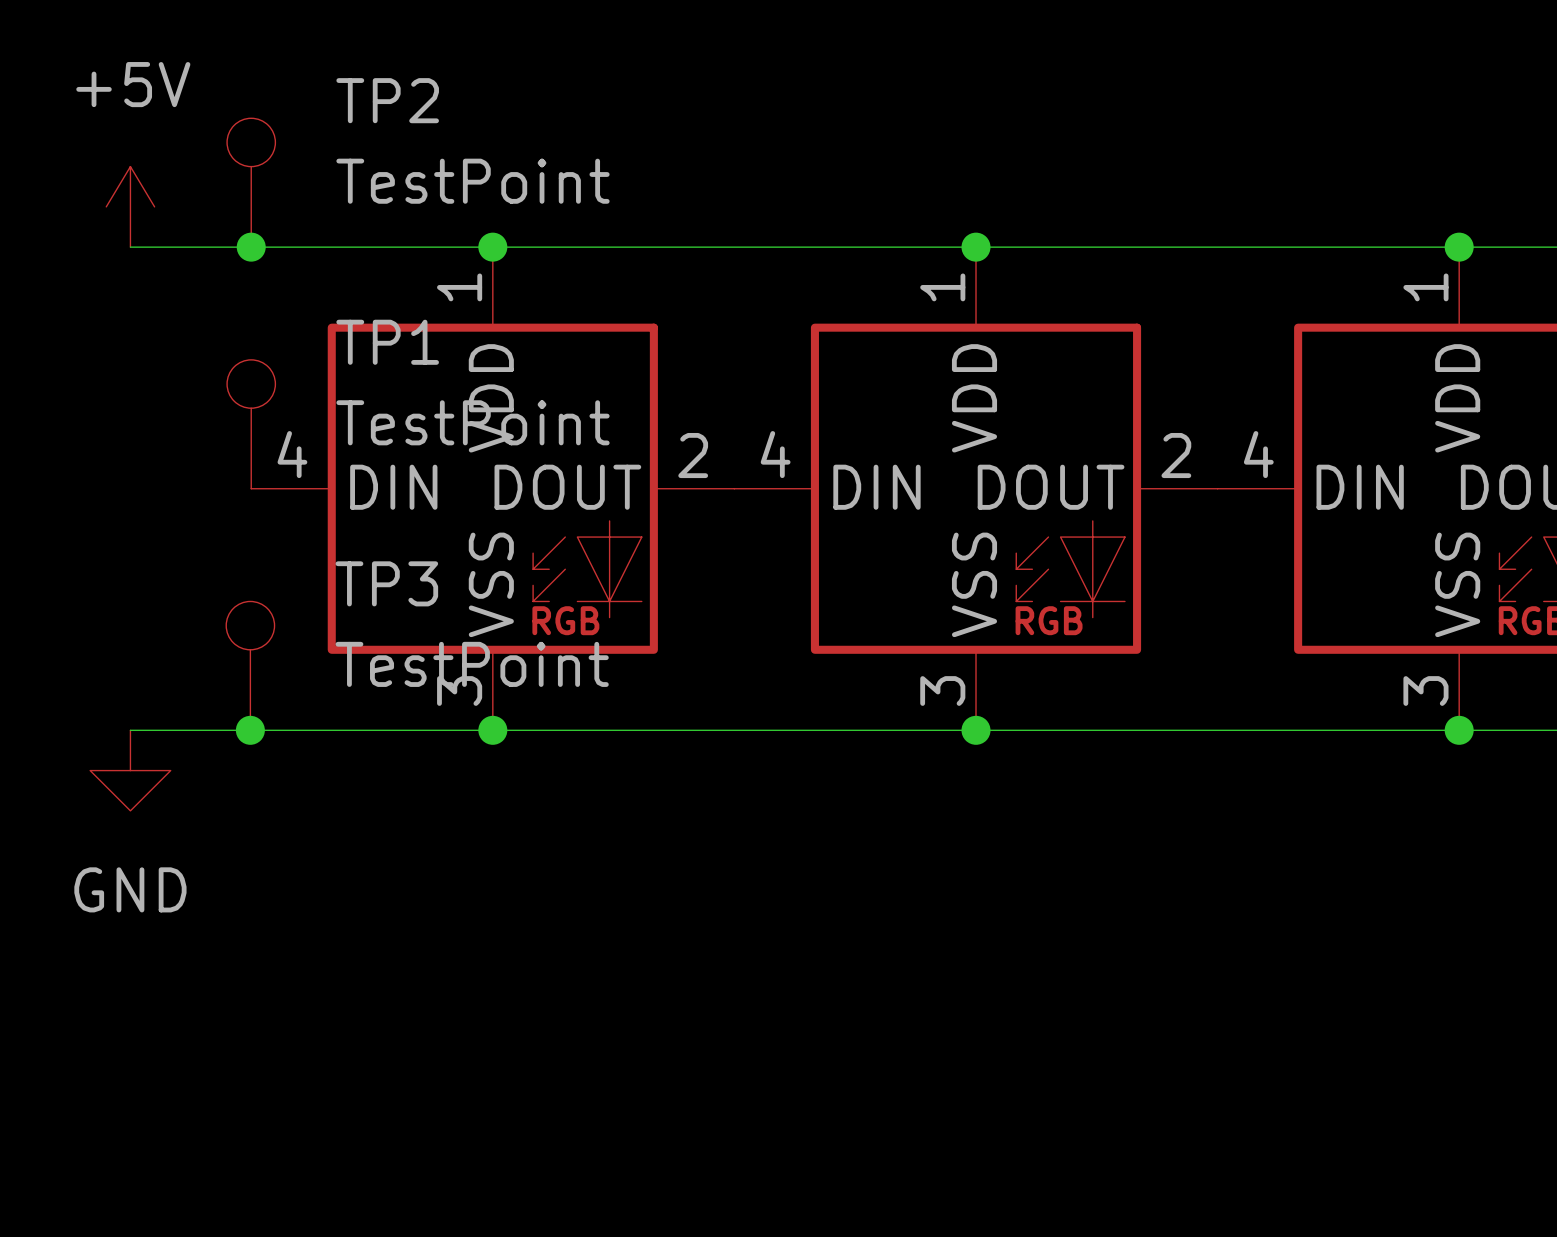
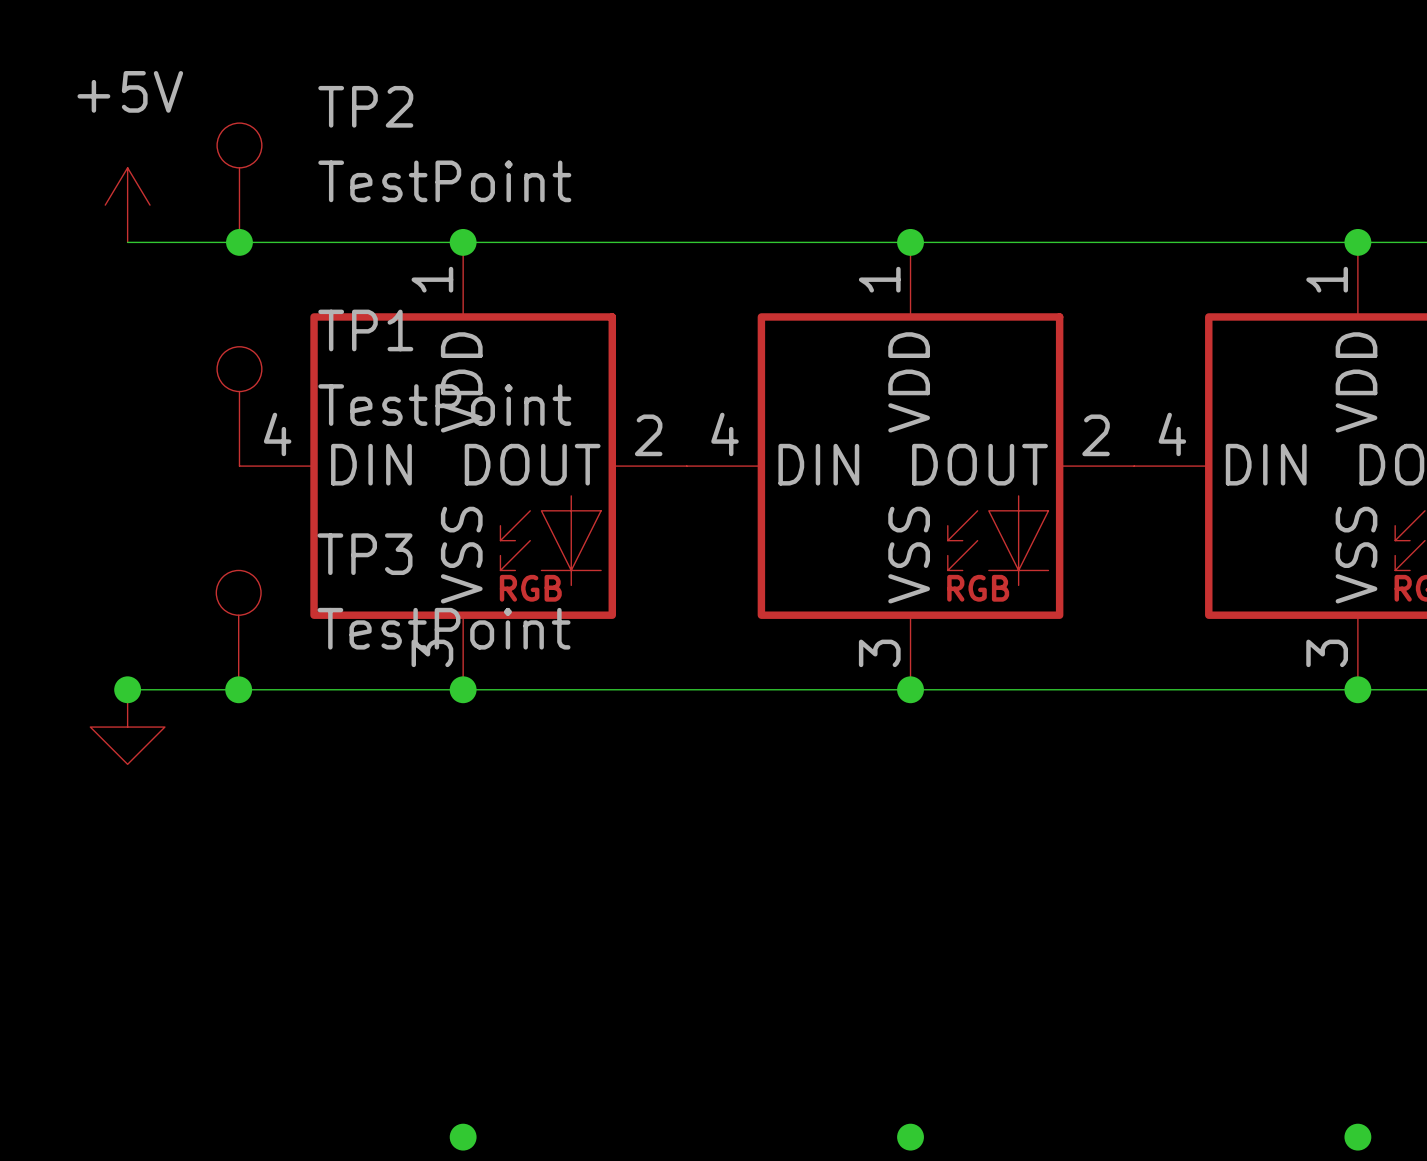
junction: none -> (127, 689)
power symbol text: GND (130, 889) -> none
junction: none -> (463, 1137)
junction: none -> (910, 1137)
junction: none -> (1357, 1137)

